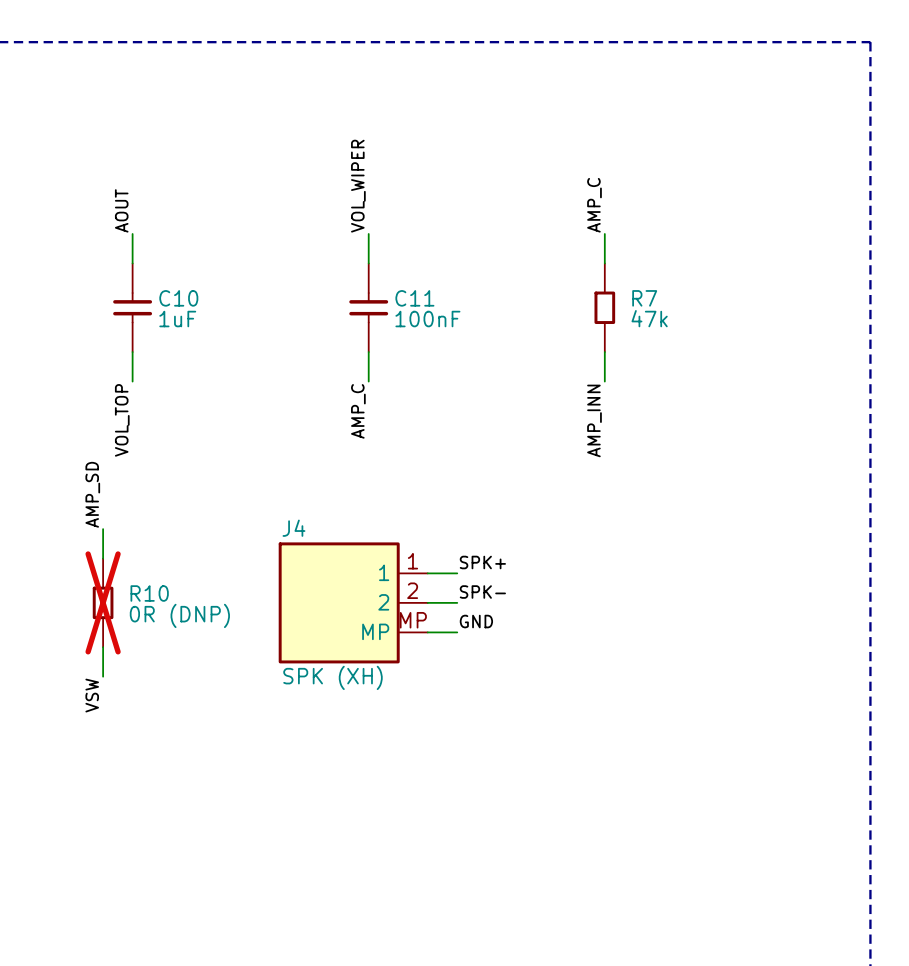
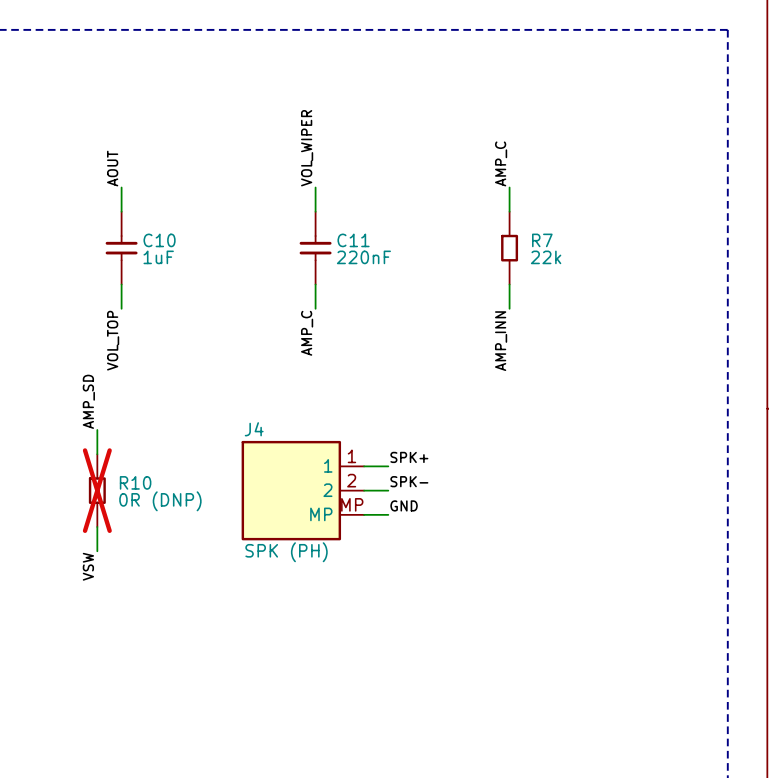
R7 value: 47k (649, 318) -> 22k (546, 257)
C11 value: 100nF (427, 319) -> 220nF (363, 257)
J4 value: SPK (XH) (332, 677) -> SPK (PH) (286, 552)

